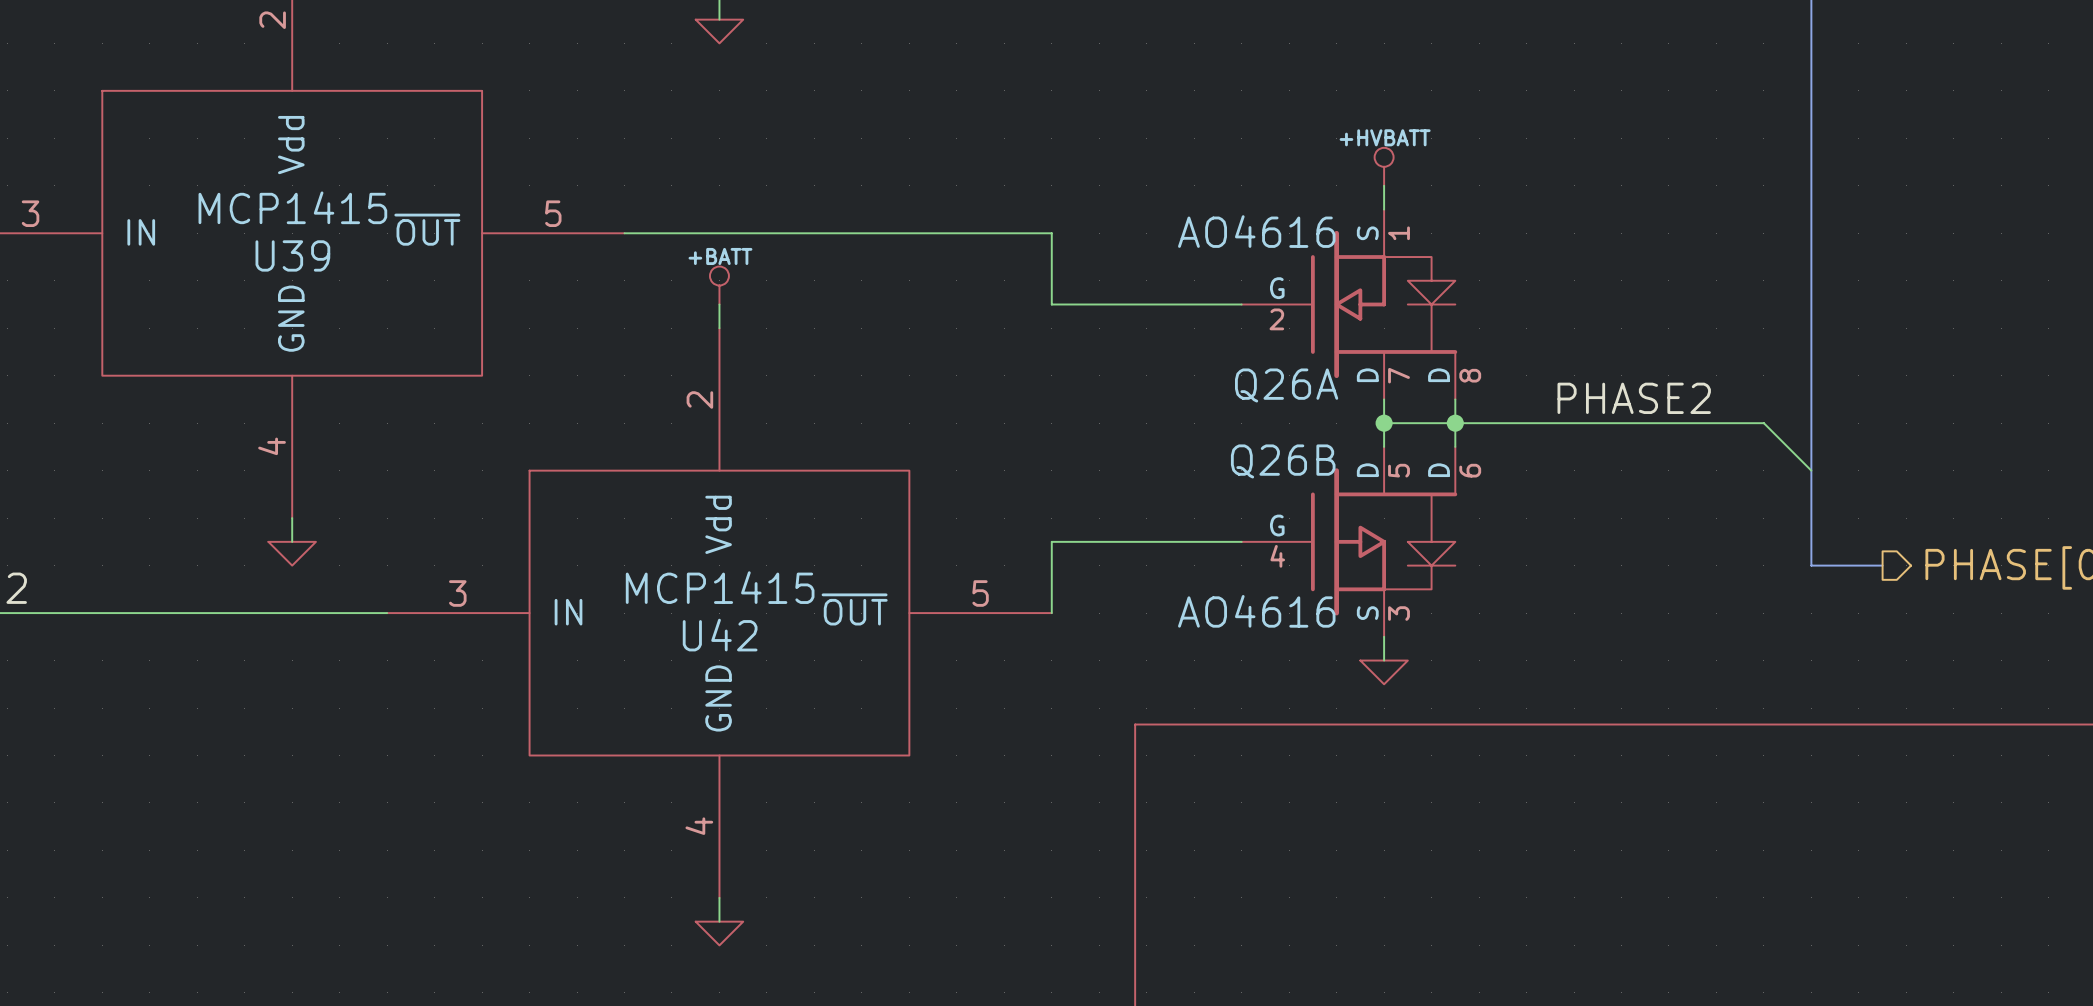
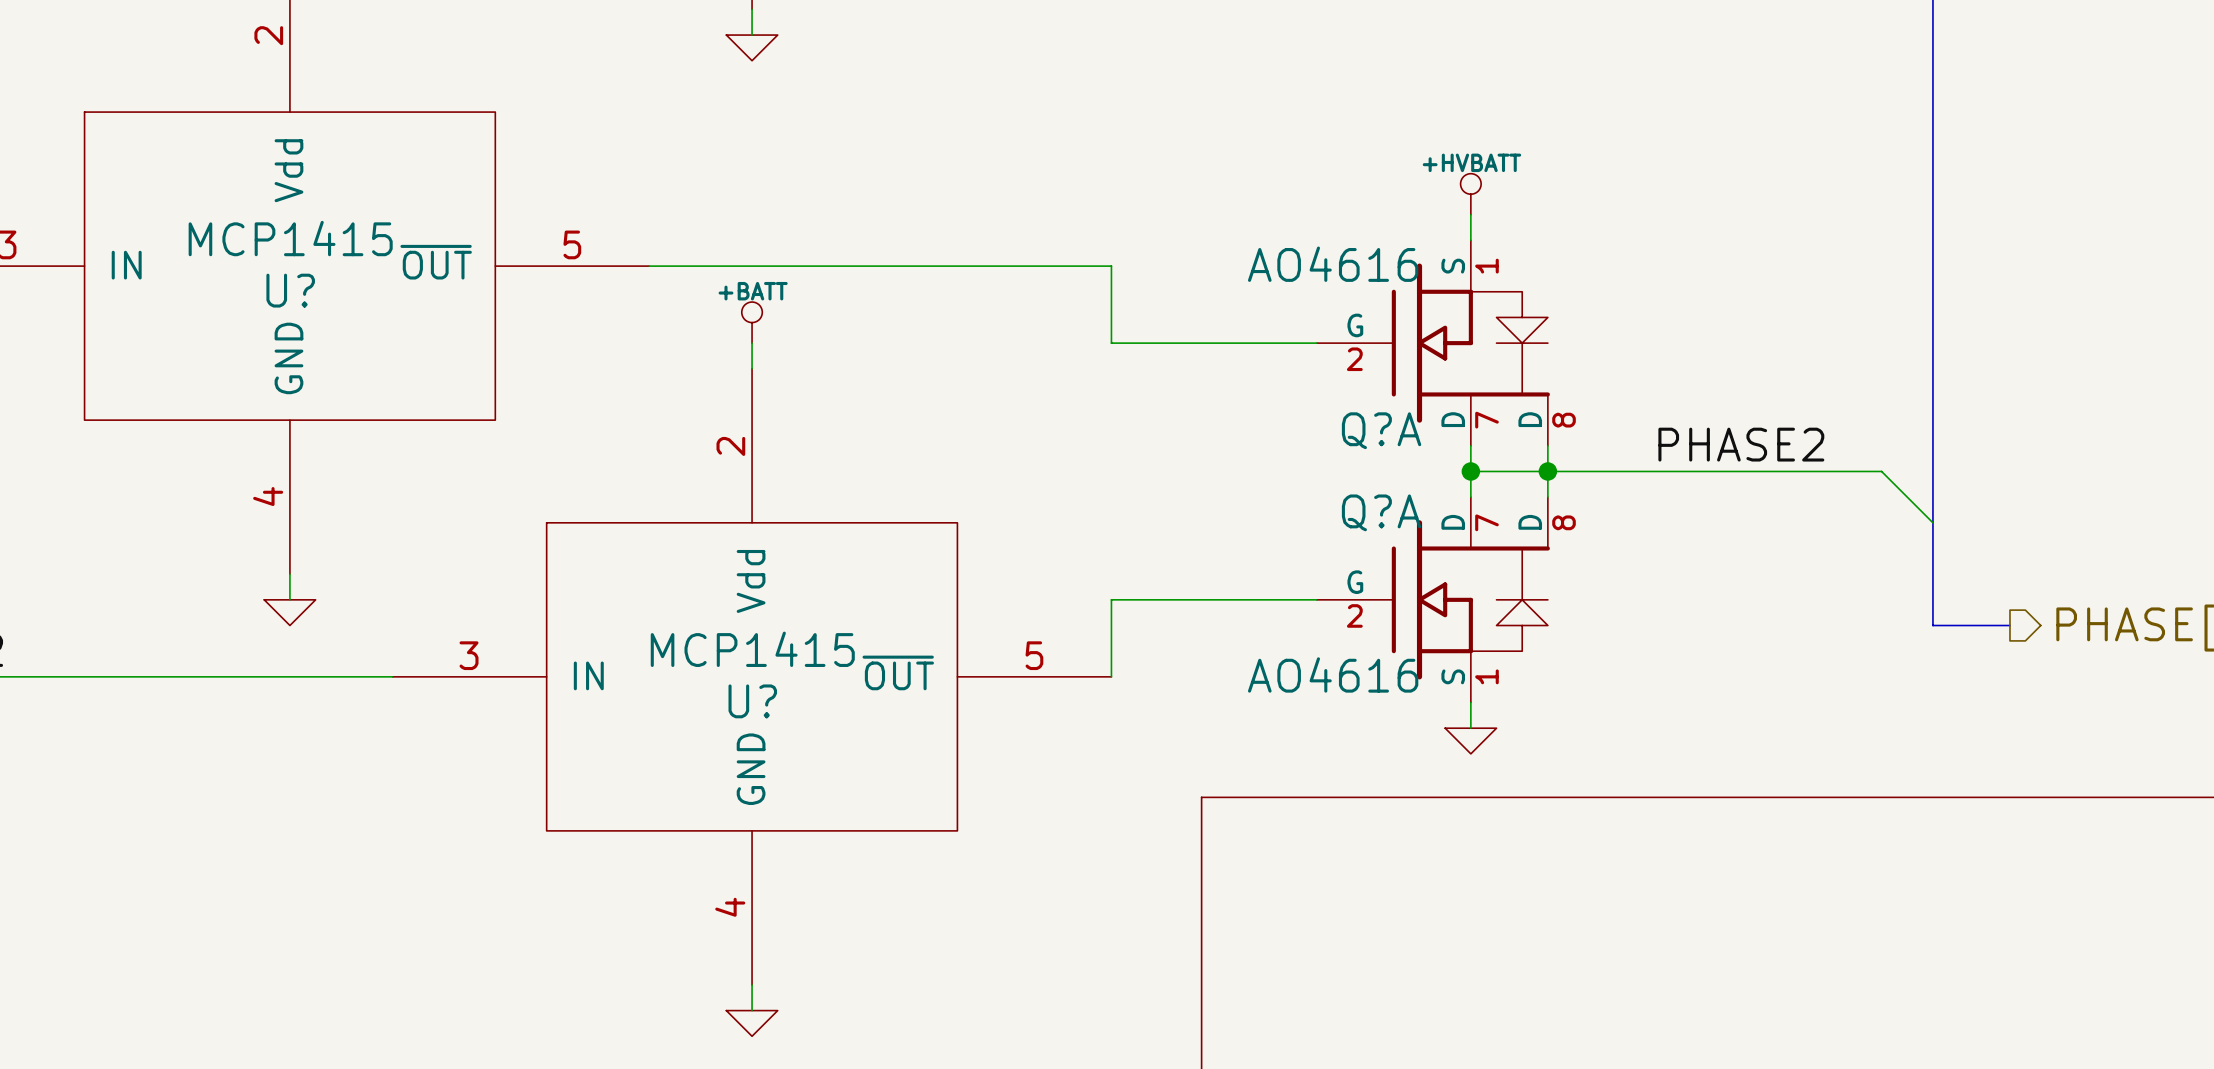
U39 name: U39 (292, 255) -> U? (290, 290)
Q26A name: Q26A (1286, 385) -> Q?A (1381, 430)
Q26B: AO4616 (1349, 541) -> none
Q?A: none -> AO4616 (1433, 599)
U42 name: U42 (720, 635) -> U? (752, 701)

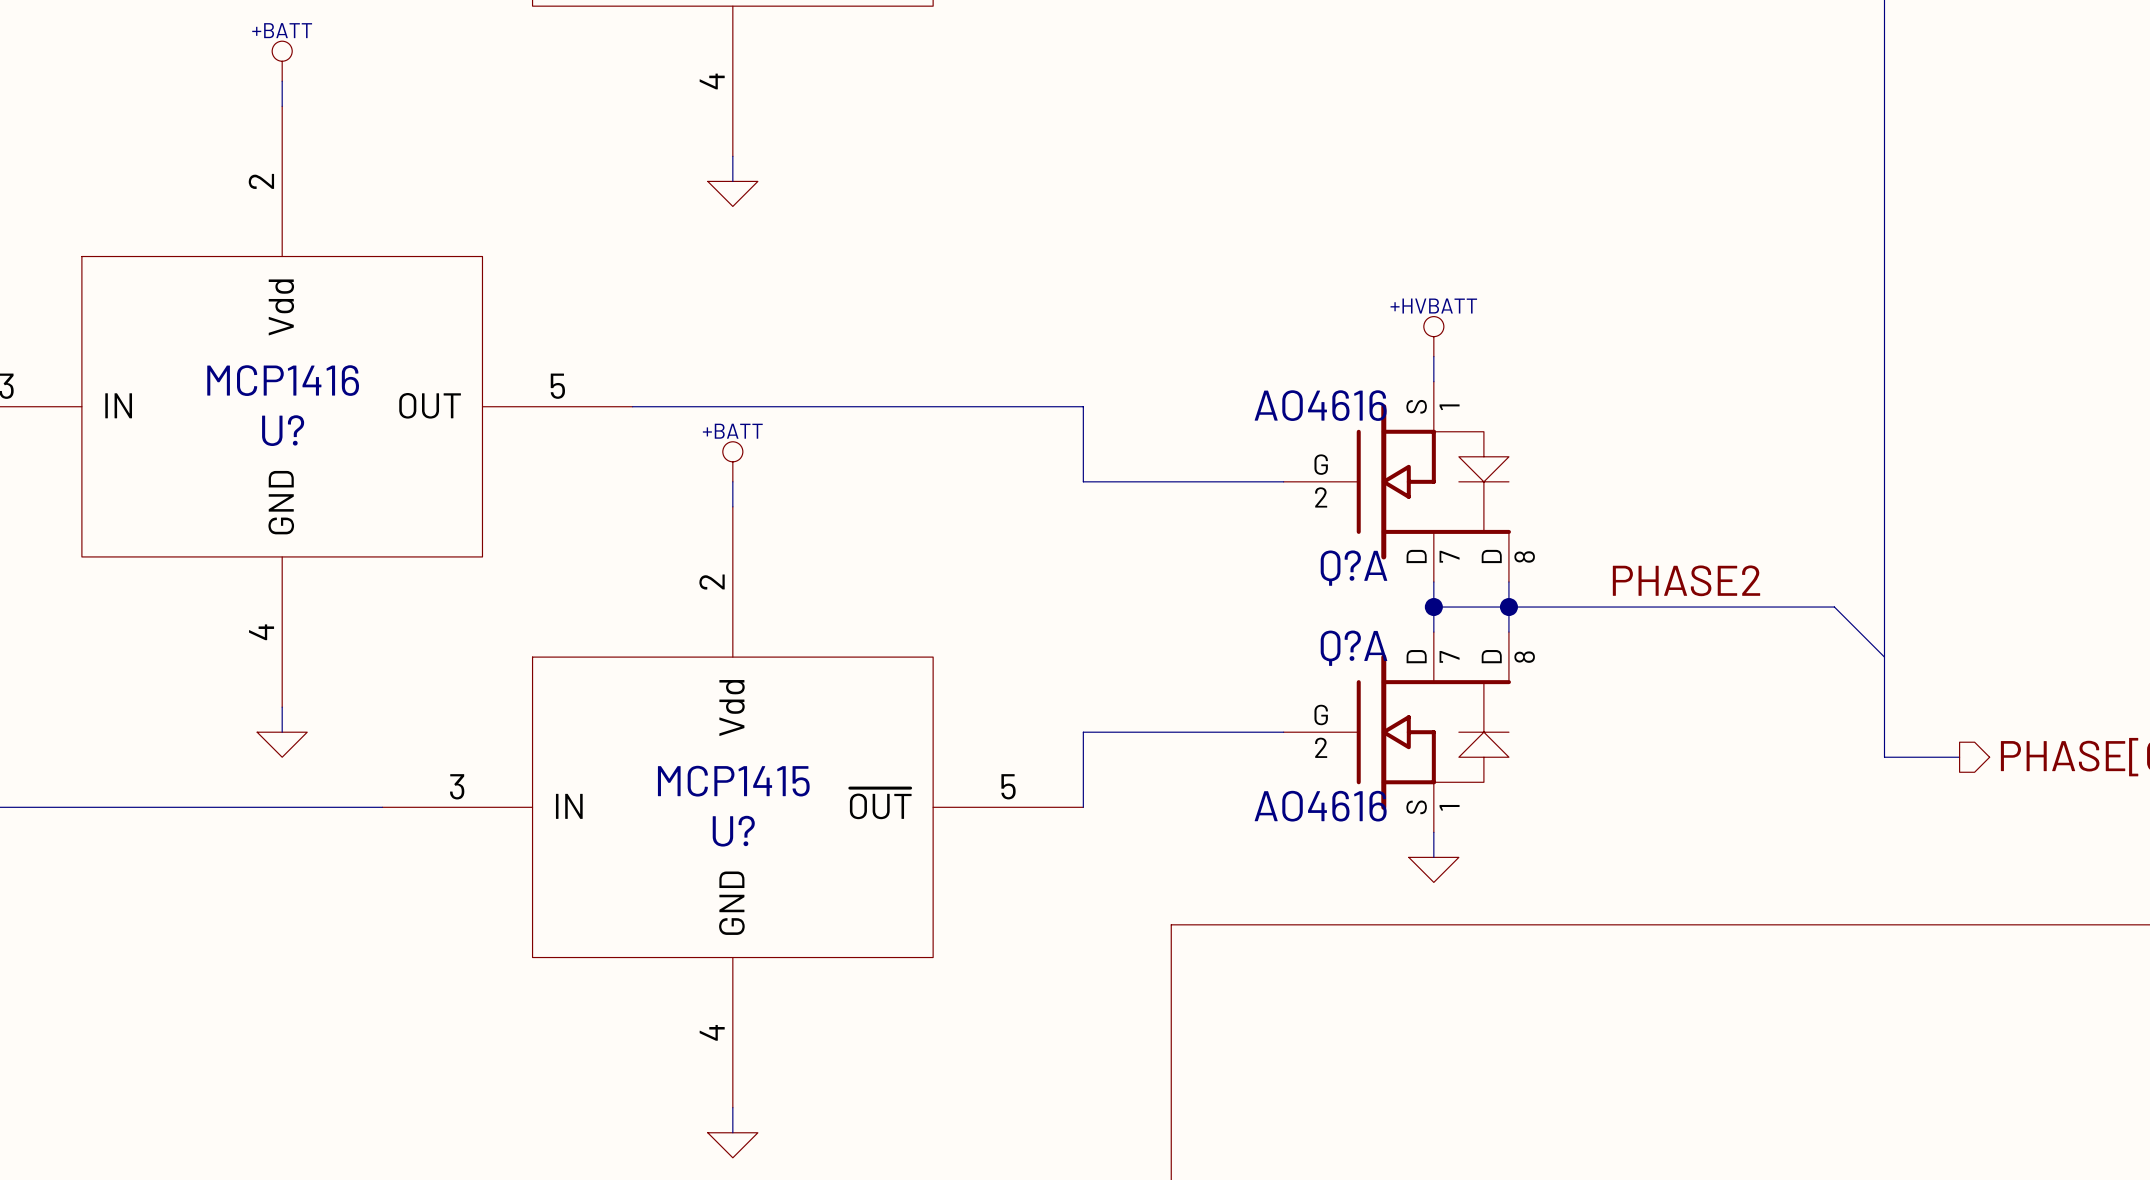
U? value: MCP1415 (290, 238) -> MCP1416 (283, 380)
U? pin name: ~{OUT} (436, 262) -> OUT (430, 405)

